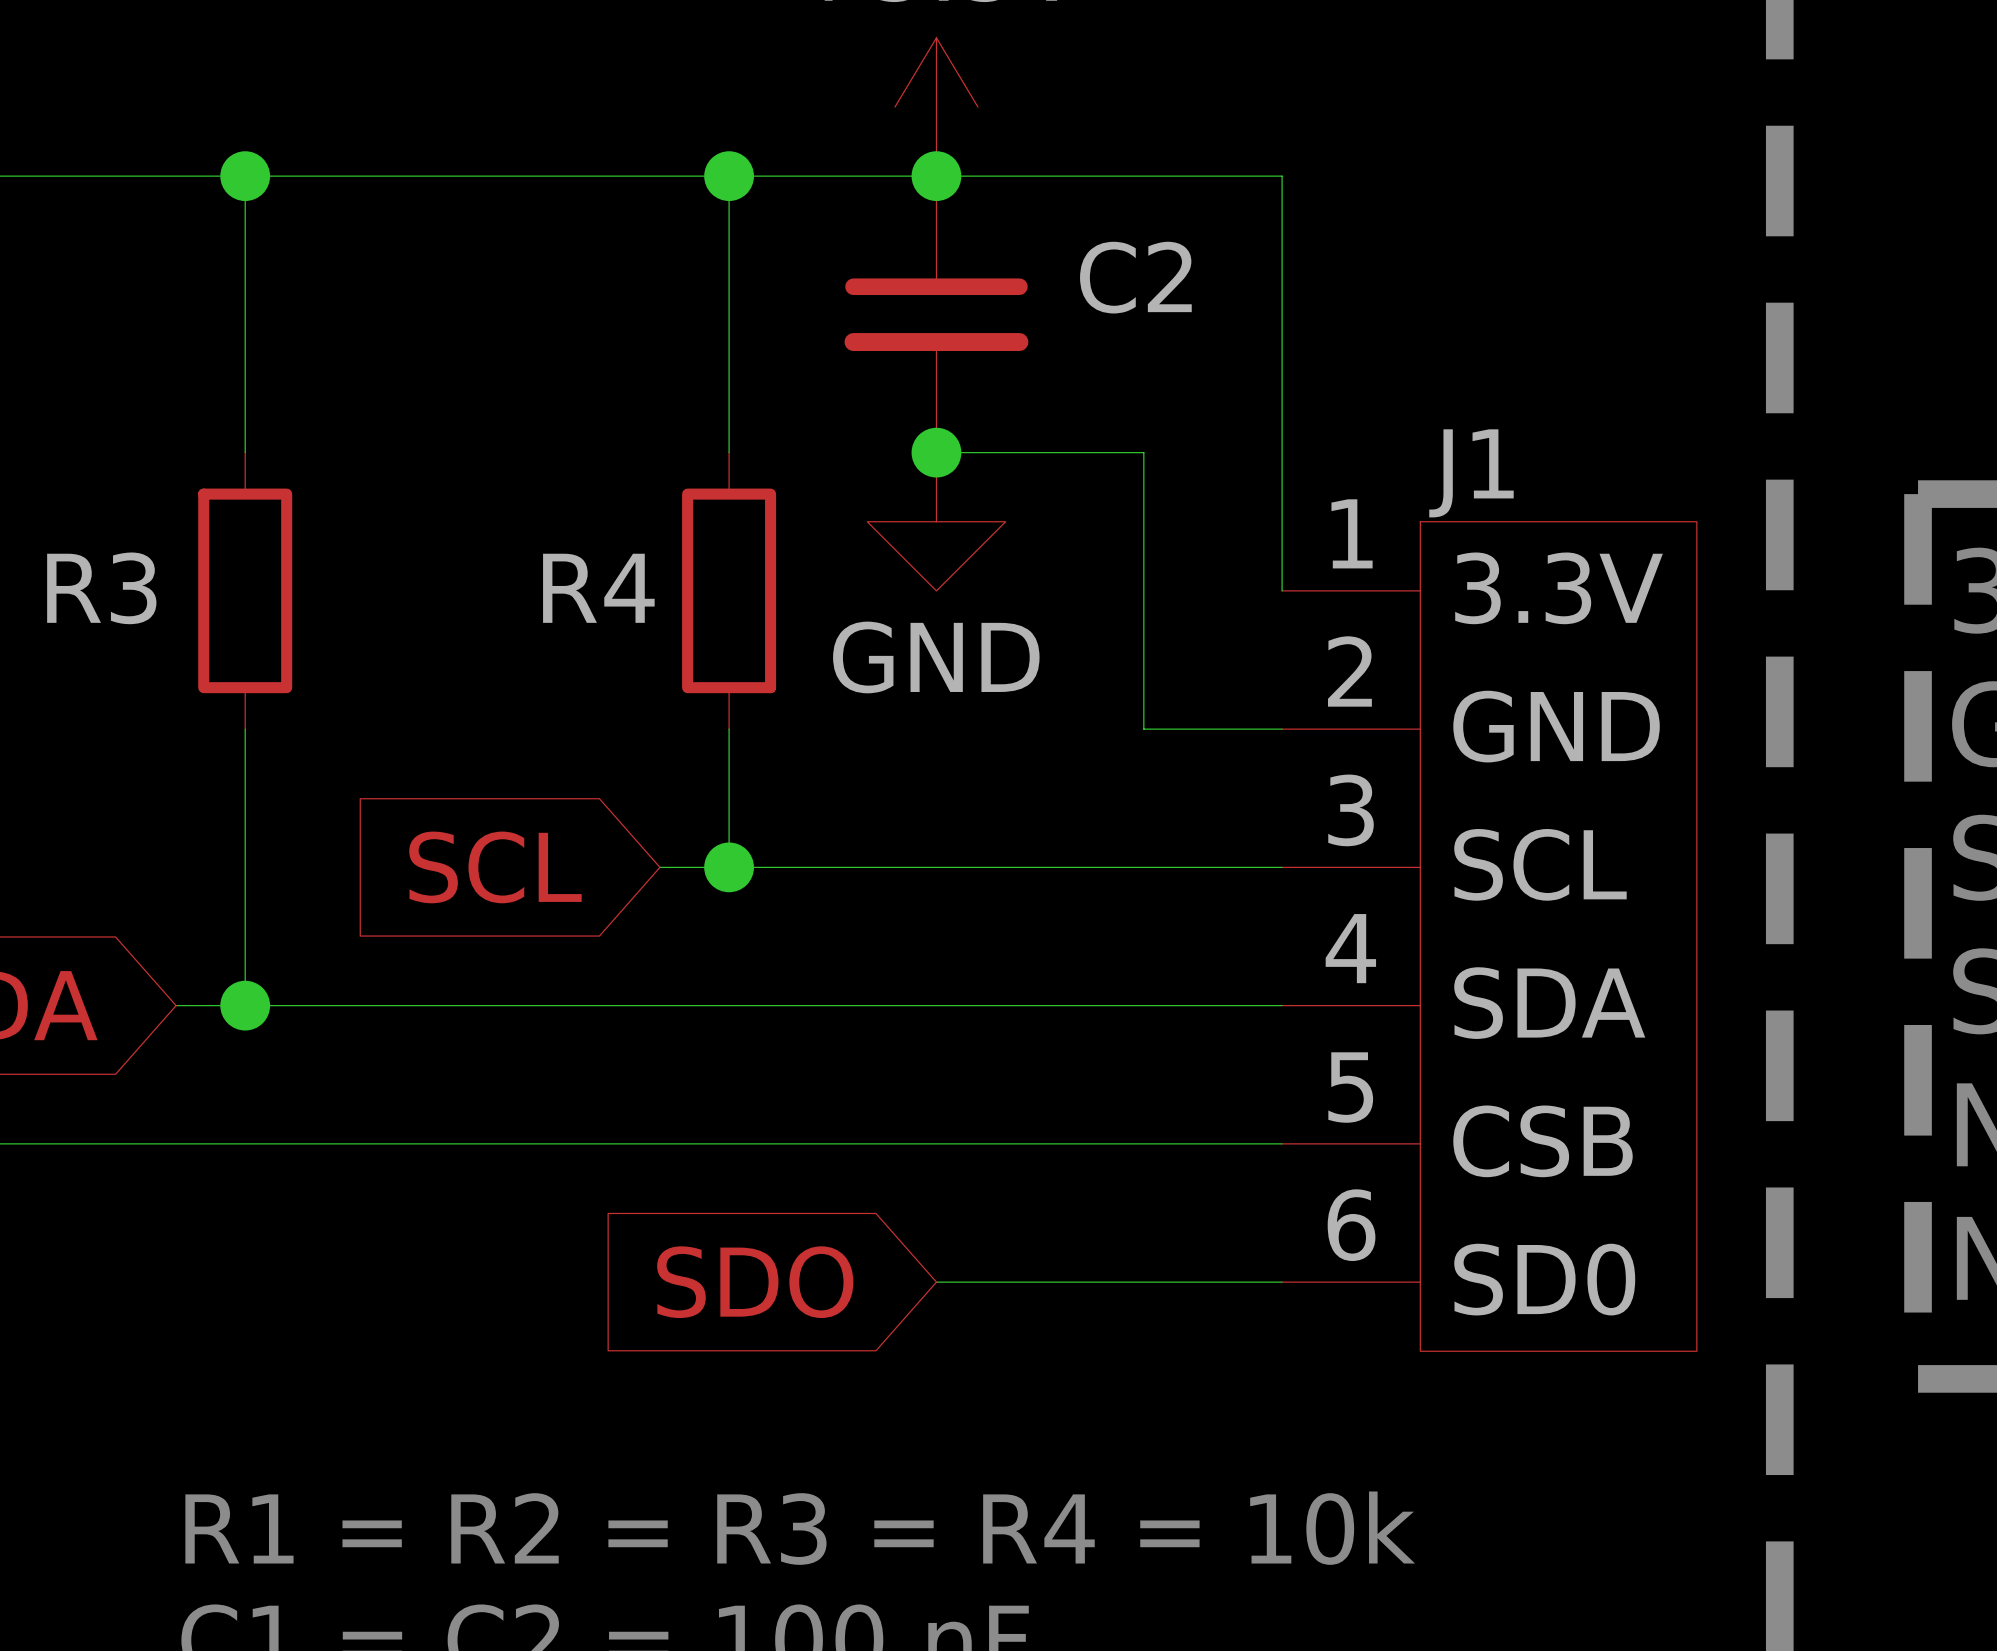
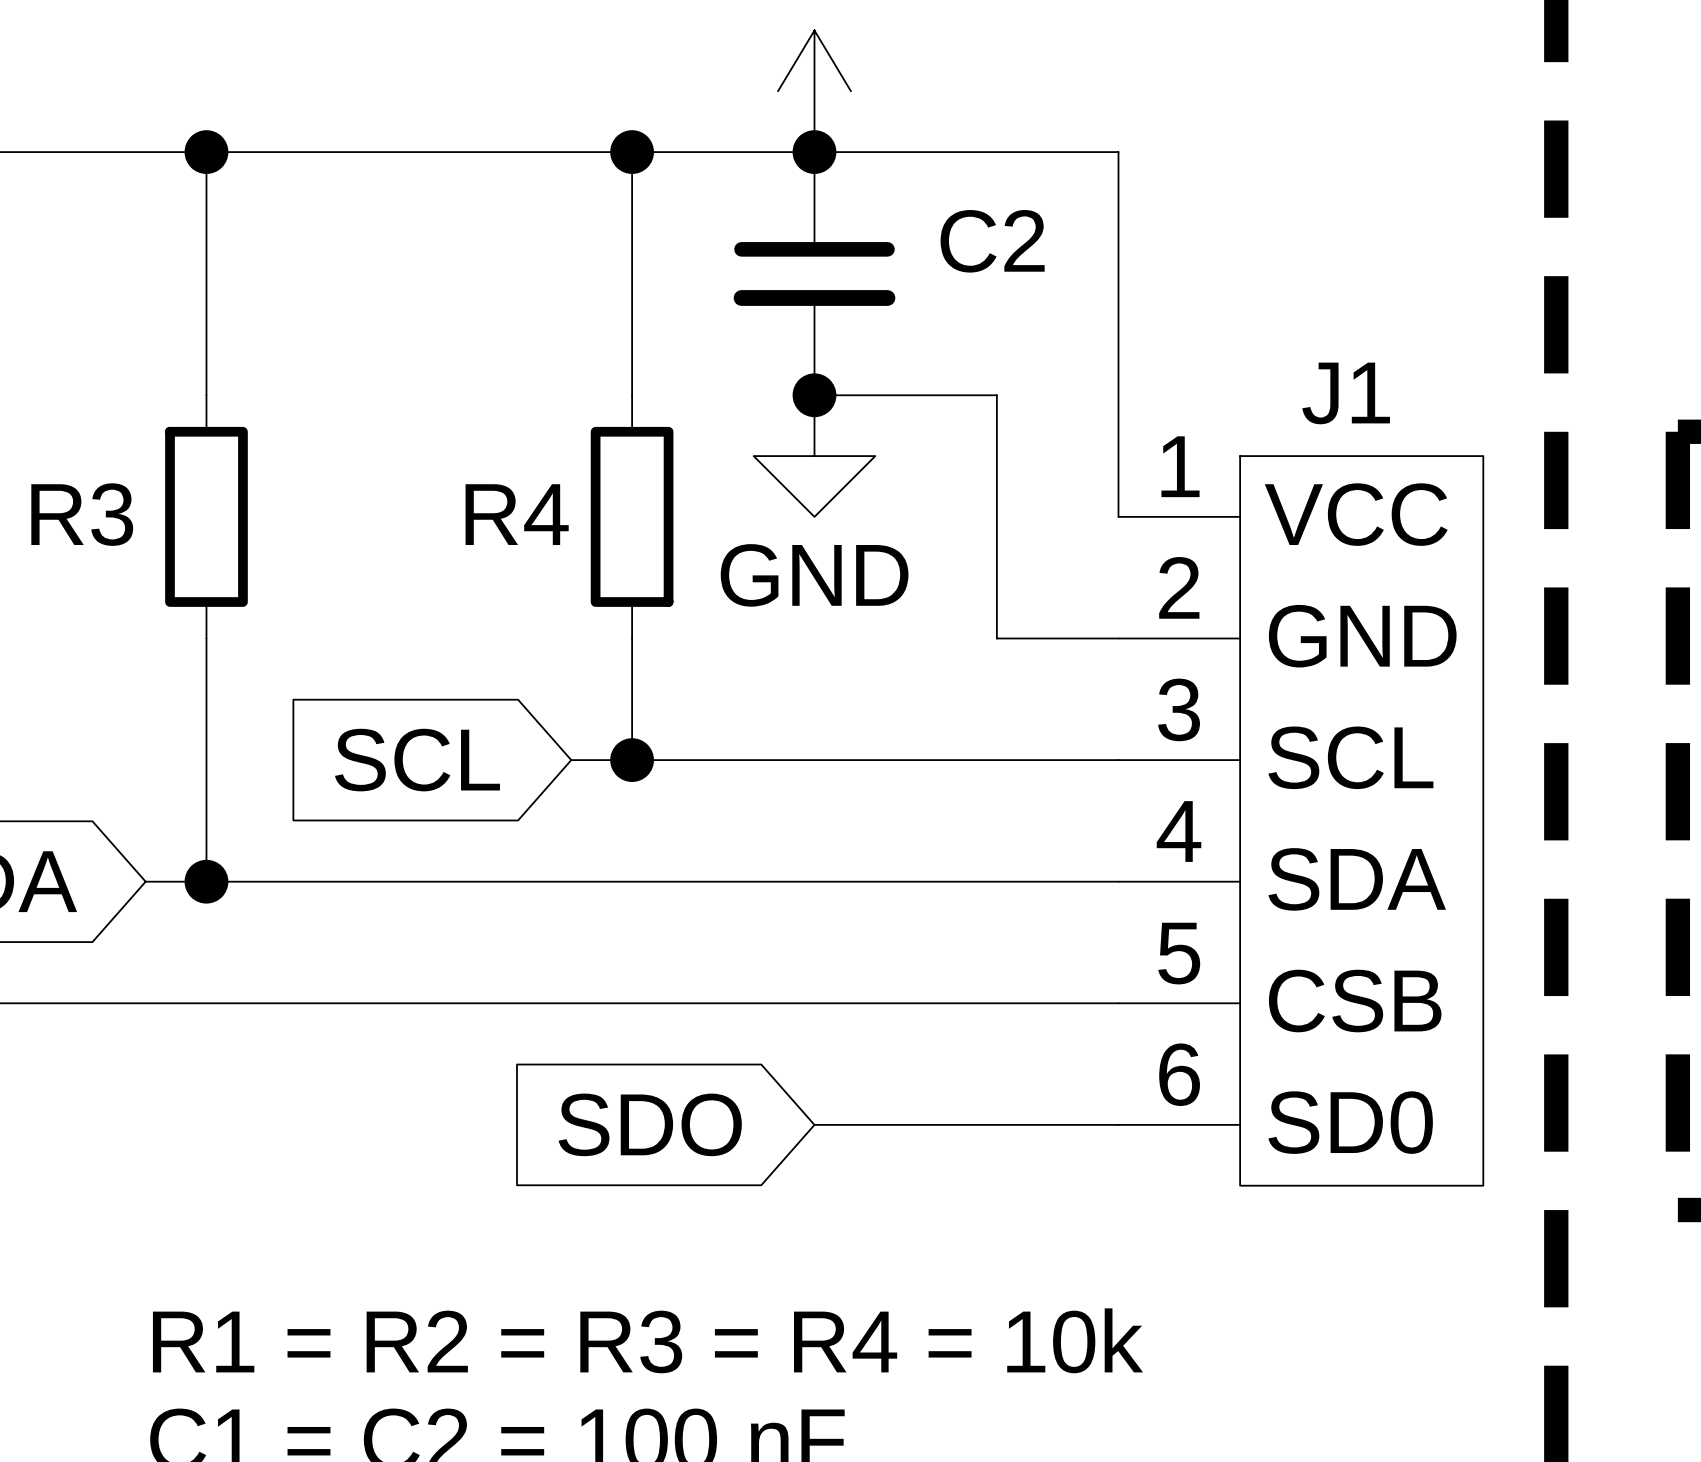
J1 name position: J1 (1471, 473) -> J1 (1346, 393)
J1 pin name: 3.3V (1559, 588) -> VCC (1356, 514)

